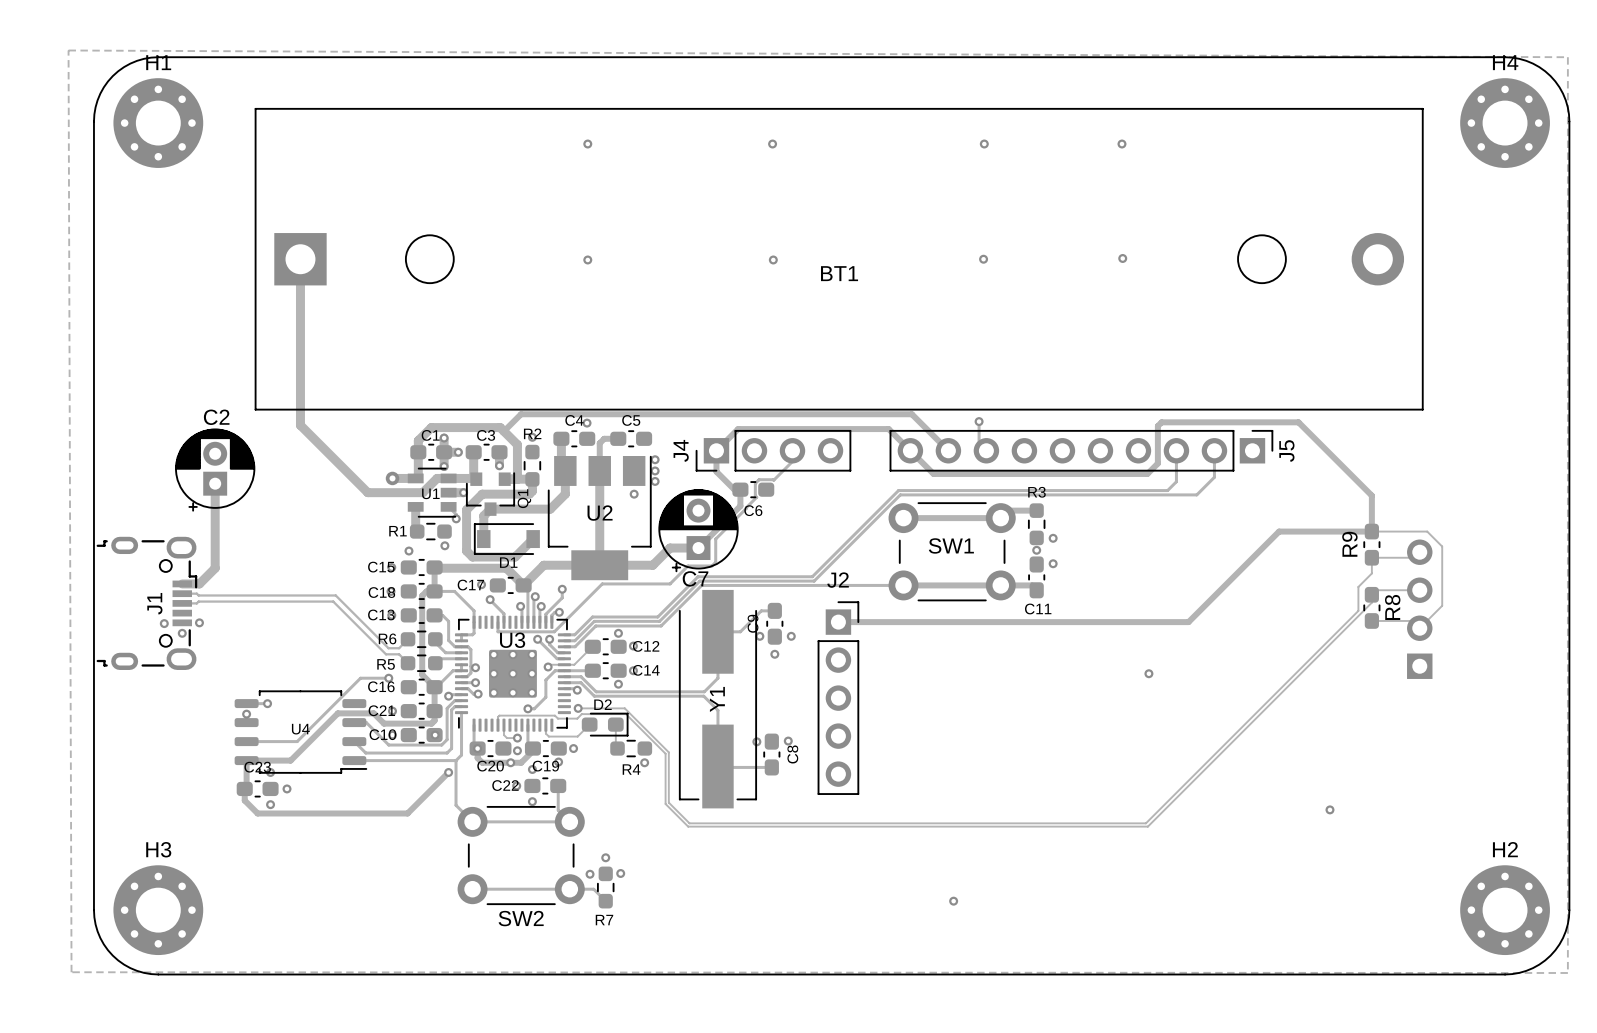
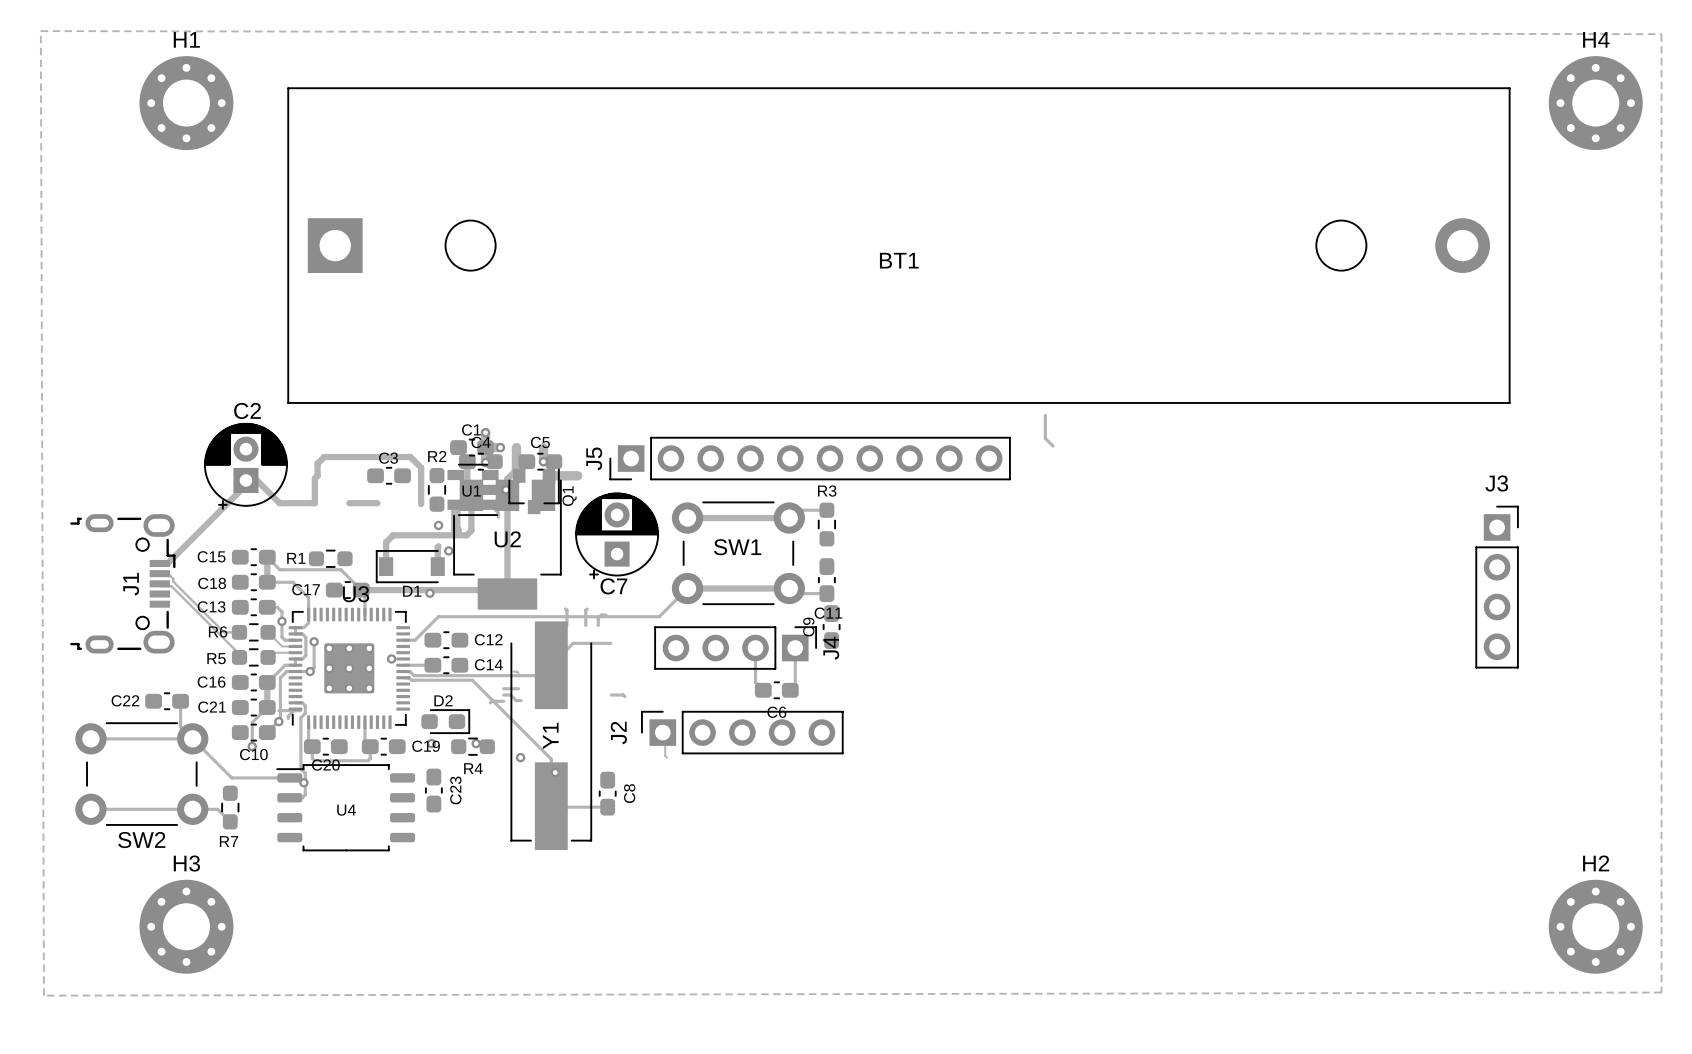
board edge: (158, 57) (1505, 57) (1519, 58) (1539, 67) (1550, 76) (1563, 93) (1567, 107) (1569, 121) (1569, 910) (1565, 931) (1559, 944) (1550, 955) (1539, 964) (1519, 972) (1505, 974) (158, 974) (144, 972) (124, 964) (112, 955) (103, 944) (95, 924) (93, 910) (93, 121) (95, 107) (100, 93) (112, 76) (130, 63) (144, 58) (158, 57) -> none
zone outline: (1567, 57) (68, 50) (71, 972) (1567, 973) -> (1661, 34) (40, 31) (43, 995) (1661, 992)
via: (587, 144) -> none
via: (772, 144) -> none
via: (984, 144) -> none
via: (1121, 144) -> none
via: (1122, 258) -> none
track: (300, 259) (300, 425) (367, 492) (422, 492) (437, 478) (475, 478) -> none
via: (587, 259) -> none
via: (773, 259) -> none
via: (983, 259) -> none
via: (979, 421) -> none
via: (587, 423) -> none
track: (503, 431) (521, 414) (911, 414) (948, 450) -> none
via: (532, 437) -> none
track: (561, 438) (561, 467) (565, 470) (565, 494) (550, 509) (490, 509) (483, 515) (483, 539) -> none
C4 position: (574, 438) -> (480, 461)
track: (618, 438) (604, 438) (599, 443) (599, 565) -> none
C5 position: (631, 438) -> (540, 461)
track: (716, 450) (716, 471) (734, 489) (740, 489) (740, 506) (698, 548) (670, 548) (652, 565) (543, 565) (523, 585) -> none
track: (716, 450) (738, 429) (888, 429) (933, 473) (1147, 473) (1157, 463) (1157, 426) (1161, 422) (1298, 422) (1371, 495) (1371, 531) -> none
J4 rotation: 0° (773, 450) -> 180° (735, 648)
J4 position: (773, 450) -> (735, 648)
track: (792, 450) (792, 461) (773, 480) (759, 479) (755, 483) (756, 497) (715, 539) (715, 562) (711, 565) (688, 565) (670, 583) (602, 583) (554, 631) (498, 631) (498, 622) -> none
J5 rotation: 0° (1081, 450) -> 180° (810, 458)
J5 position: (1081, 450) -> (810, 458)
track: (1176, 450) (1176, 481) (1167, 490) (898, 490) (812, 576) (698, 576) (657, 617) (592, 617) (574, 634) (564, 634) -> none
track: (1214, 450) (1214, 477) (1196, 494) (900, 494) (814, 581) (699, 581) (659, 621) (594, 621) (574, 640) (564, 640) -> none
C3 position: (486, 452) -> (389, 475)
via: (655, 459) -> none
track: none -> (467, 461) (467, 491) (471, 495) (471, 530) (466, 535) (393, 535) (386, 542) (386, 566)
track: none -> (526, 461) (507, 478) (507, 594) (503, 590) (361, 590)
R2 position: (532, 465) -> (437, 489)
via: (655, 470) -> none
track: (392, 478) (415, 478) (418, 475) (418, 440) (431, 427) (500, 427) (517, 444) (517, 479) -> none
via: (392, 478) -> none
track: (532, 479) (532, 491) (529, 494) (482, 494) (466, 509) (466, 551) (472, 557) (515, 557) (533, 539) -> none
via: (655, 481) -> none
track: none -> (245, 480) (256, 480) (279, 503) (314, 503) (314, 478) (317, 475) (317, 463) (324, 456) (410, 456) (421, 467) (421, 504)
track: (215, 488) (215, 568) (199, 583) (182, 583) -> (245, 485) (167, 563) (159, 563)
C6 position: (753, 489) -> (776, 690)
via: (634, 494) -> none
track: none -> (349, 503) (377, 503)
track: (1036, 510) (1008, 510) (1000, 518) (903, 518) -> (826, 510) (797, 510) (789, 518) (687, 518)
via: (456, 518) -> none
U2 position: (599, 518) -> (507, 544)
R3 position: (1036, 524) -> (826, 524)
via: none -> (438, 525)
C7 position: (698, 530) -> (617, 535)
R1 position: (430, 531) -> (330, 558)
track: (1371, 531) (1279, 531) (1188, 622) (838, 622) -> none
track: (1371, 531) (1427, 531) (1442, 546) (1442, 605) (1419, 628) (1412, 620) (1371, 620) -> none
via: (1053, 538) -> none
D1 position: (506, 539) -> (410, 566)
R9: (1371, 544) -> none
via: (444, 545) -> none
track: none -> (438, 546) (437, 566)
via: (1036, 550) -> none
SW1 position: (952, 551) -> (738, 553)
track: (1419, 552) (1414, 557) (1371, 557) (1371, 573) (1358, 586) (1358, 610) (1145, 823) (689, 823) (668, 802) (668, 752) (624, 708) (578, 708) -> none
via: (1053, 563) -> none
via: (391, 567) -> none
C15 position: (421, 567) -> (253, 557)
track: none -> (159, 573) (161, 575) (169, 575) (173, 581) (224, 632) (239, 632)
C11 position: (1036, 577) -> (826, 580)
track: none -> (159, 583) (162, 586) (171, 586) (239, 654) (239, 657) (242, 657)
via: (481, 584) -> none
C17 position: (510, 585) -> (347, 590)
track: (523, 585) (506, 568) (434, 567) (434, 591) -> none
track: (523, 585) (527, 589) (527, 622) -> none
track: (562, 589) (562, 597) (545, 614) (545, 622) -> none
via: (562, 589) -> none
track: (1036, 590) (1031, 585) (701, 585) (661, 625) (595, 625) (575, 646) (564, 646) -> none
track: (1419, 590) (1376, 590) (1371, 594) (1371, 602) (1147, 826) (688, 826) (665, 804) (665, 753) (625, 714) (581, 714) (577, 718) (557, 718) (554, 715) (499, 715) (498, 725) -> none
C18 position: (421, 591) -> (253, 582)
track: (434, 591) (454, 591) (474, 610) (474, 633) (461, 634) (461, 640) -> none
track: (434, 591) (426, 591) (422, 595) (422, 674) (434, 687) -> none
track: none -> (826, 593) (794, 593) (789, 588) (687, 588) (659, 616) (438, 616) (415, 640) (403, 640)
track: (182, 593) (196, 593) (198, 595) (335, 595) (388, 648) (399, 648) (408, 639) -> none
track: (535, 596) (533, 622) -> none
via: (535, 596) -> none
track: (490, 599) (503, 613) (503, 622) -> none
via: (490, 599) -> none
J1 position: (146, 603) -> (122, 583)
track: (182, 603) (196, 603) (198, 601) (333, 601) (386, 654) (399, 654) (408, 663) -> none
track: none -> (267, 607) (277, 607) (281, 612) (281, 637) (285, 640) (295, 640)
via: (520, 606) -> none
via: (541, 606) -> none
R8: (1371, 607) -> none
J3 side: bottom (1419, 609) -> top (1497, 587)
track: (774, 610) (761, 610) (740, 631) (717, 631) (717, 678) (704, 691) (596, 691) (581, 676) (564, 676) -> none
track: none -> (364, 614) (364, 593) (340, 569) (279, 569) (267, 557) (267, 582) (292, 582) (308, 597) (308, 622) (303, 627) (295, 627) (295, 633) (302, 633) (305, 637) (305, 655) (302, 658) (295, 658) (295, 665) (285, 665) (267, 682) (267, 707) (252, 722) (252, 746)
via: (559, 612) -> none
via: (391, 615) -> none
C13 position: (421, 615) -> (253, 607)
track: (434, 615) (442, 615) (448, 621) (448, 640) (454, 646) (468, 646) (470, 649) (470, 672) (467, 676) (461, 676) -> none
via: none -> (281, 621)
via: (199, 622) -> none
via: (164, 623) -> none
track: none -> (268, 632) (282, 646) (295, 646)
via: (182, 633) -> none
via: (618, 633) -> none
via: (759, 636) -> none
via: (791, 636) -> none
track: none -> (314, 641) (314, 667) (310, 671) (286, 671) (280, 677) (280, 719) (267, 732)
via: none -> (314, 641)
R6 position: (421, 639) -> (253, 632)
track: (435, 639) (435, 642) (445, 652) (461, 652) -> none
track: (537, 639) (557, 658) (564, 658) -> none
via: (537, 639) -> none
track: (549, 639) (549, 644) (557, 652) (564, 652) -> none
via: (549, 639) -> none
track: none -> (610, 643) (573, 643) (540, 675) (414, 675) (409, 671) (403, 671)
U3 name position: U3 (512, 640) -> U3 (355, 594)
track: none -> (755, 648) (755, 682) (763, 690)
track: none -> (795, 648) (795, 685) (790, 690)
track: (592, 646) (574, 664) (550, 664) (548, 666) -> none
C12 position: (605, 646) -> (446, 640)
via: (633, 646) -> none
via: none -> (391, 658)
via: (774, 654) -> none
track: (461, 658) (439, 658) (435, 663) -> (295, 652) (272, 652) (268, 657)
track: none -> (403, 665) (432, 665)
R5 position: (421, 663) -> (253, 657)
track: (461, 664) (461, 670) (453, 670) (434, 687) -> none
via: none -> (310, 671)
via: (548, 666) -> none
via: (475, 667) -> none
track: (592, 670) (555, 670) (545, 680) (545, 697) (534, 708) (527, 708) -> none
C14 position: (605, 670) -> (446, 665)
via: (633, 670) -> none
track: none -> (403, 677) (409, 677) (411, 680) (472, 680) (551, 759) (552, 807) (607, 807)
U3 position: (512, 673) -> (349, 668)
via: (1148, 673) -> none
track: (388, 678) (360, 678) (297, 741) (246, 741) -> none
via: (388, 678) -> none
via: (475, 682) -> none
track: (564, 682) (580, 682) (594, 696) (703, 696) (717, 710) (717, 766) -> none
via: (618, 684) -> none
C16 position: (421, 687) -> (253, 682)
track: (434, 687) (434, 720) (431, 723) (384, 723) (373, 713) (337, 713) (290, 760) (246, 760) (244, 800) (257, 813) (407, 813) (448, 772) -> none
via: (577, 690) -> none
track: none -> (180, 701) (180, 726) (231, 777) (289, 777)
via: (478, 694) -> none
track: none -> (295, 702) (302, 702) (305, 705) (305, 713) (300, 717) (300, 768) (305, 773) (305, 794) (302, 797) (289, 797)
via: (448, 696) -> none
J2 rotation: 0° (838, 698) -> 90° counterclockwise (742, 732)
J2 position: (838, 698) -> (742, 732)
Y1 position: (717, 699) -> (551, 735)
track: (461, 700) (454, 700) (447, 708) (447, 739) (441, 745) (388, 745) (366, 722) (354, 722) -> none
track: none -> (295, 709) (288, 718)
via: (267, 703) -> none
track: (461, 706) (454, 706) (451, 710) (451, 748) (447, 753) (365, 753) (354, 741) -> none
via: (527, 708) -> none
via: (578, 708) -> none
via: (392, 711) -> none
C21 position: (421, 711) -> (253, 707)
track: (461, 712) (461, 755) (456, 760) -> none
track: none -> (308, 722) (308, 742) (312, 746) (312, 758) (314, 760) (368, 760) (370, 758) (370, 746) (364, 741) (364, 722)
track: (589, 724) (577, 736) (548, 736) (545, 733) (545, 725) -> none
D2 position: (605, 724) -> (445, 721)
track: (474, 725) (474, 744) (477, 748) (477, 758) (482, 762) (521, 762) (532, 750) (527, 743) (527, 725) -> none
track: (503, 725) (503, 735) (506, 738) (517, 738) -> none
track: none -> (90, 738) (192, 738)
U4 rotation: 0° (300, 732) -> 180° (345, 807)
C10 name position: C10 (382, 734) -> C10 (253, 754)
C10 position: (421, 735) -> (253, 732)
via: none -> (252, 746)
via: (517, 738) -> none
via: (756, 741) -> none
via: (788, 741) -> none
C20 position: (490, 748) -> (325, 746)
C19 position: (545, 748) -> (383, 746)
via: (573, 748) -> none
R4 position: (631, 748) -> (473, 746)
via: (517, 750) -> none
C8 position: (771, 754) -> (607, 793)
track: (354, 760) (456, 760) -> none
track: (456, 760) (456, 805) (472, 821) (569, 821) (558, 810) (558, 785) -> none
via: (558, 762) -> none
via: (644, 762) -> none
C19 name position: C19 (545, 766) -> C19 (426, 746)
track: (718, 767) (771, 767) -> none
via: (532, 769) -> none
via: (448, 772) -> none
via: (516, 785) -> none
C22 position: (545, 785) -> (167, 701)
C23 rotation: 0° (257, 788) -> 90° clockwise (433, 790)
C23 position: (257, 788) -> (433, 790)
via: (287, 788) -> none
track: none -> (90, 809) (217, 809) (230, 821)
via: (532, 801) -> none
via: (270, 804) -> none
via: (1329, 809) -> none
SW2 position: (521, 855) -> (141, 774)
via: (605, 857) -> none
via: (620, 873) -> none
via: (590, 874) -> none
R7 position: (605, 887) -> (230, 807)
track: (472, 889) (593, 889) (605, 901) -> none
via: (953, 901) -> none

